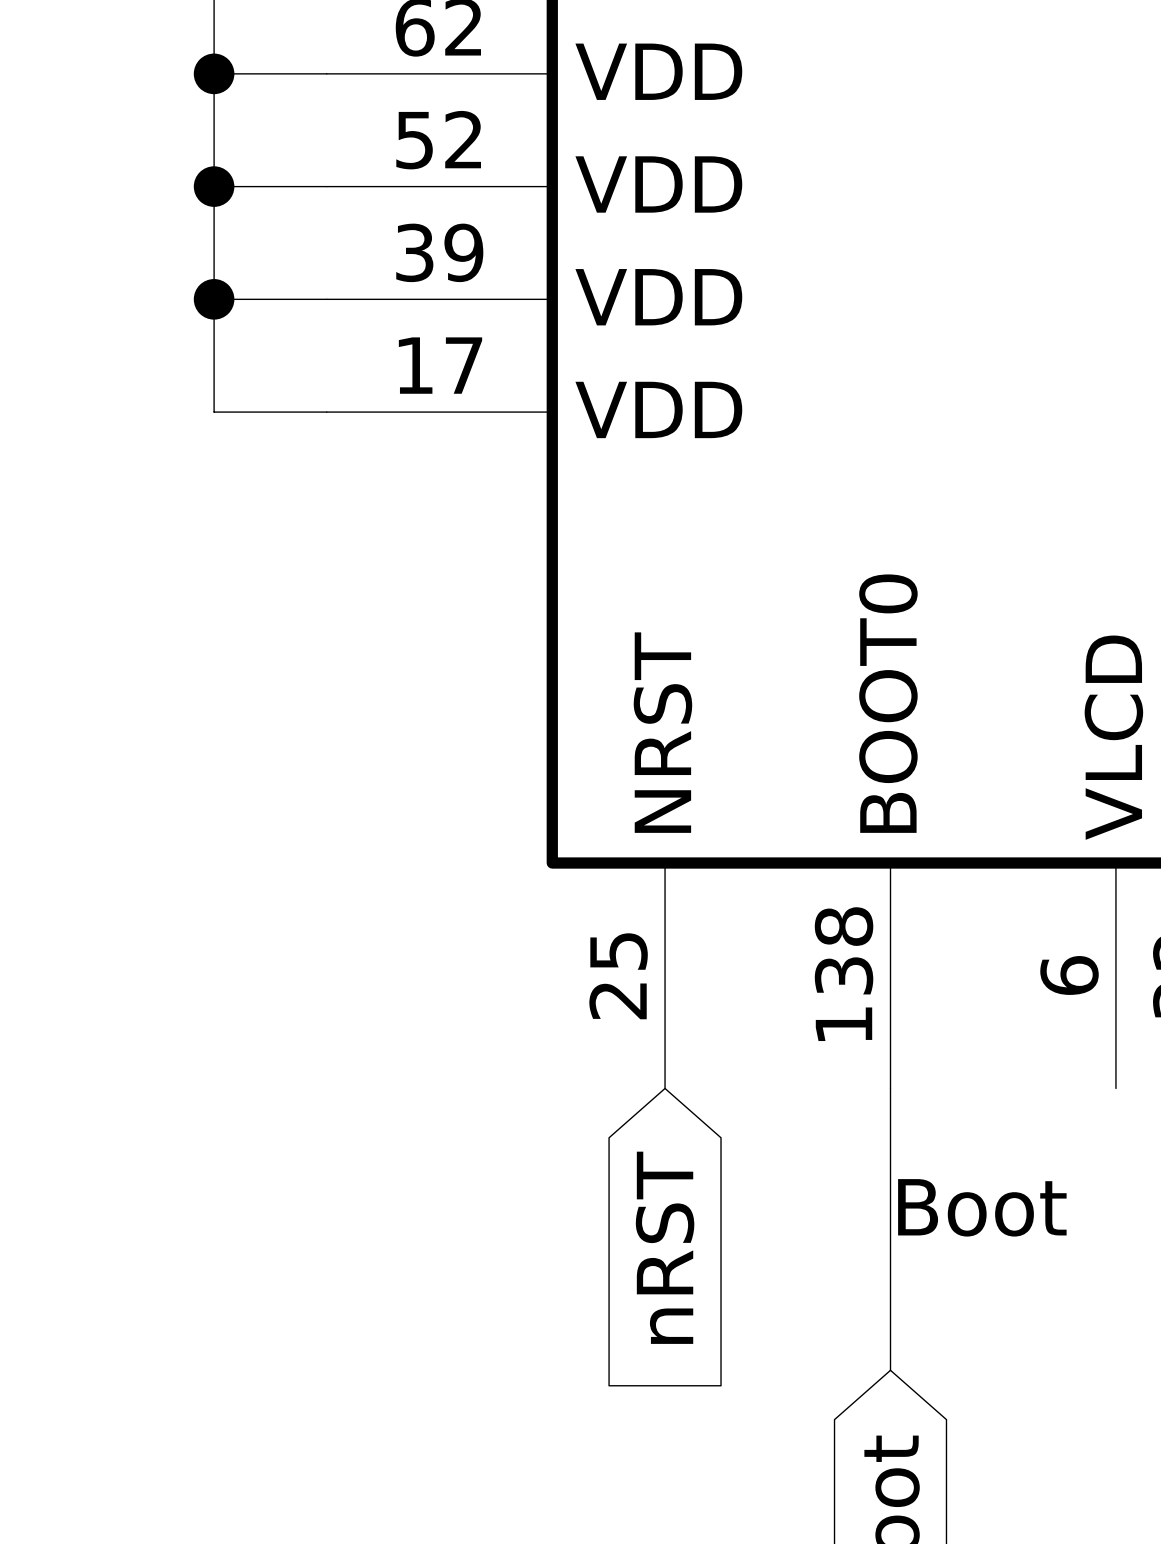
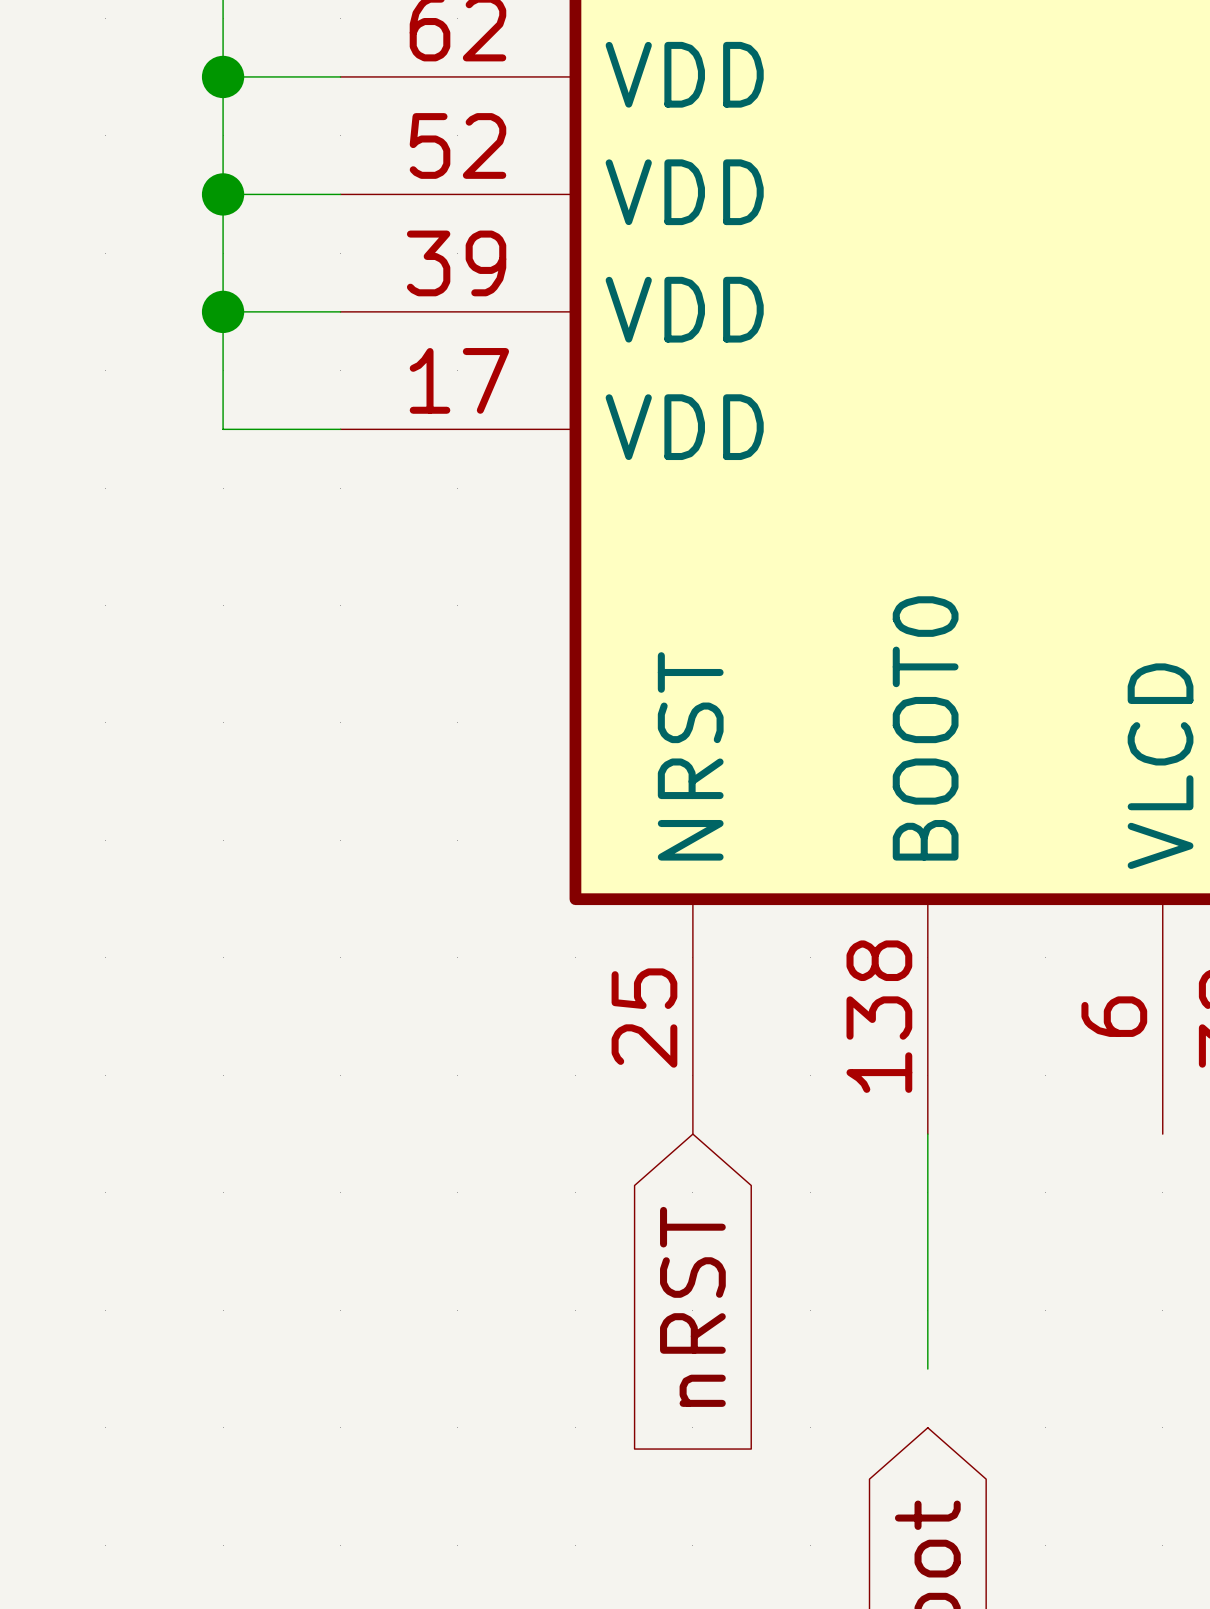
label: Boot (982, 1207) -> none
wire: (890, 1313) (890, 1370) -> none

